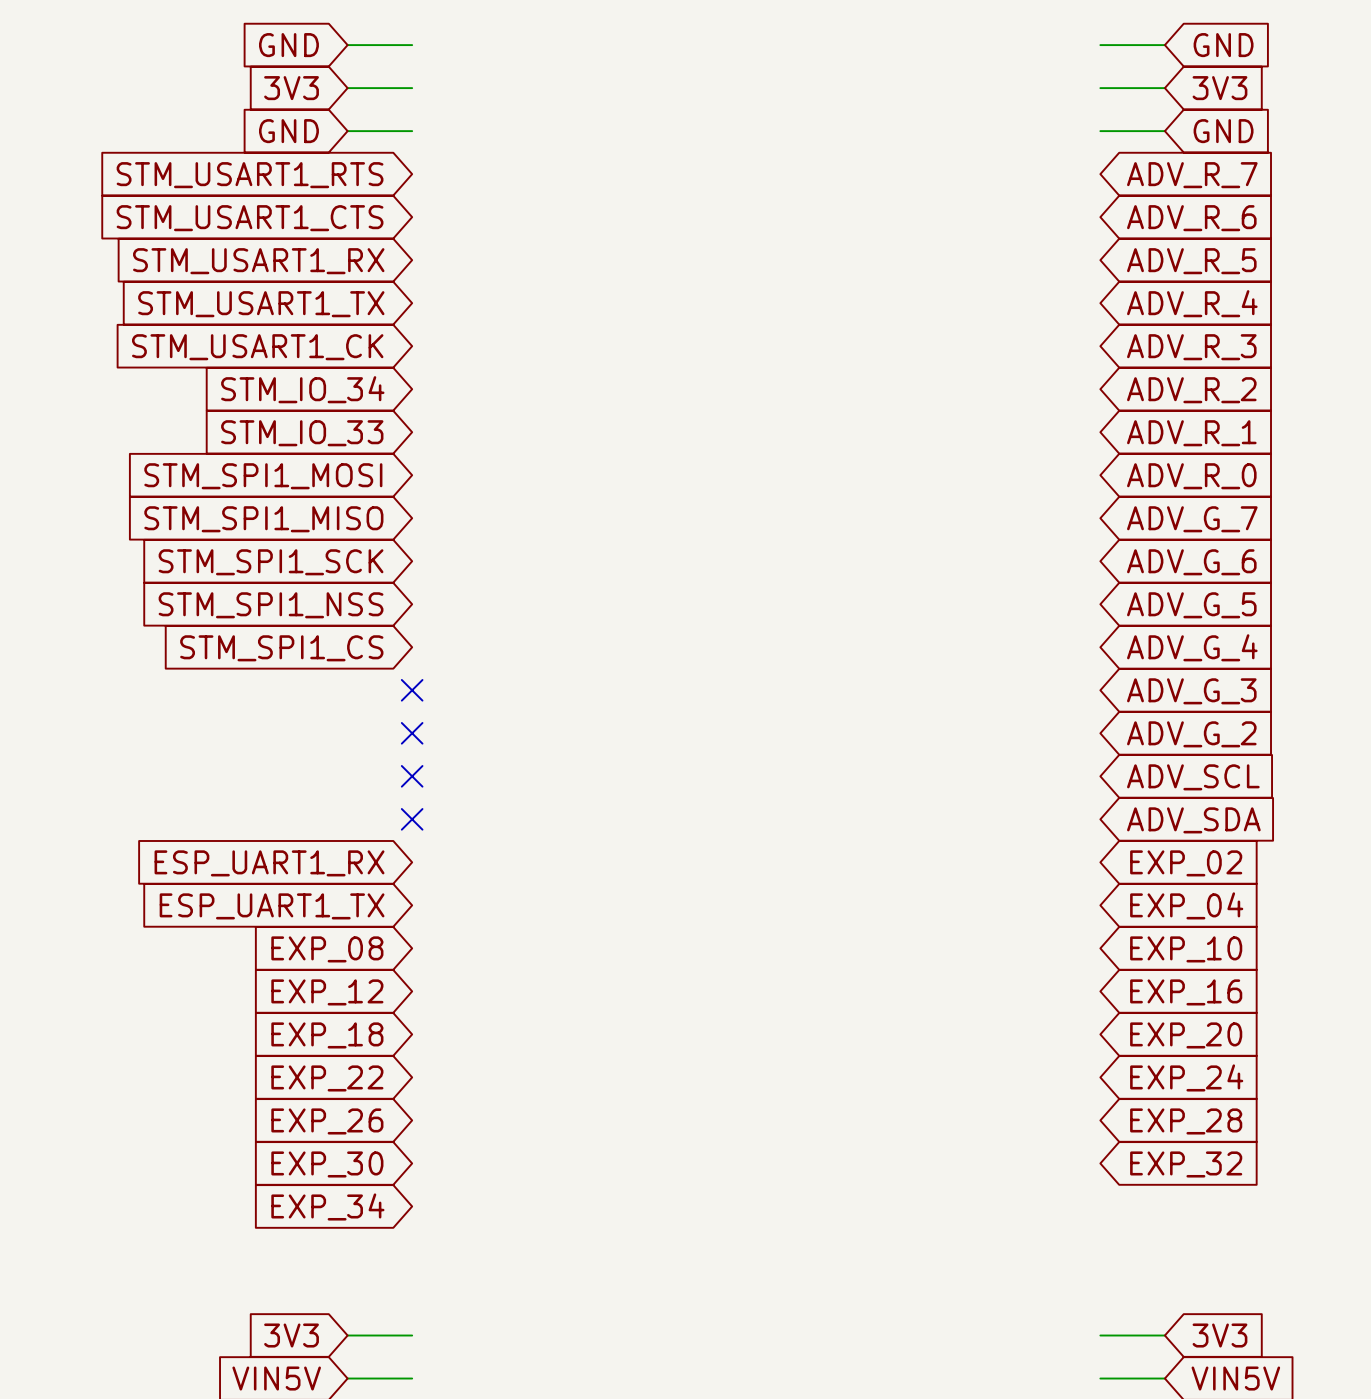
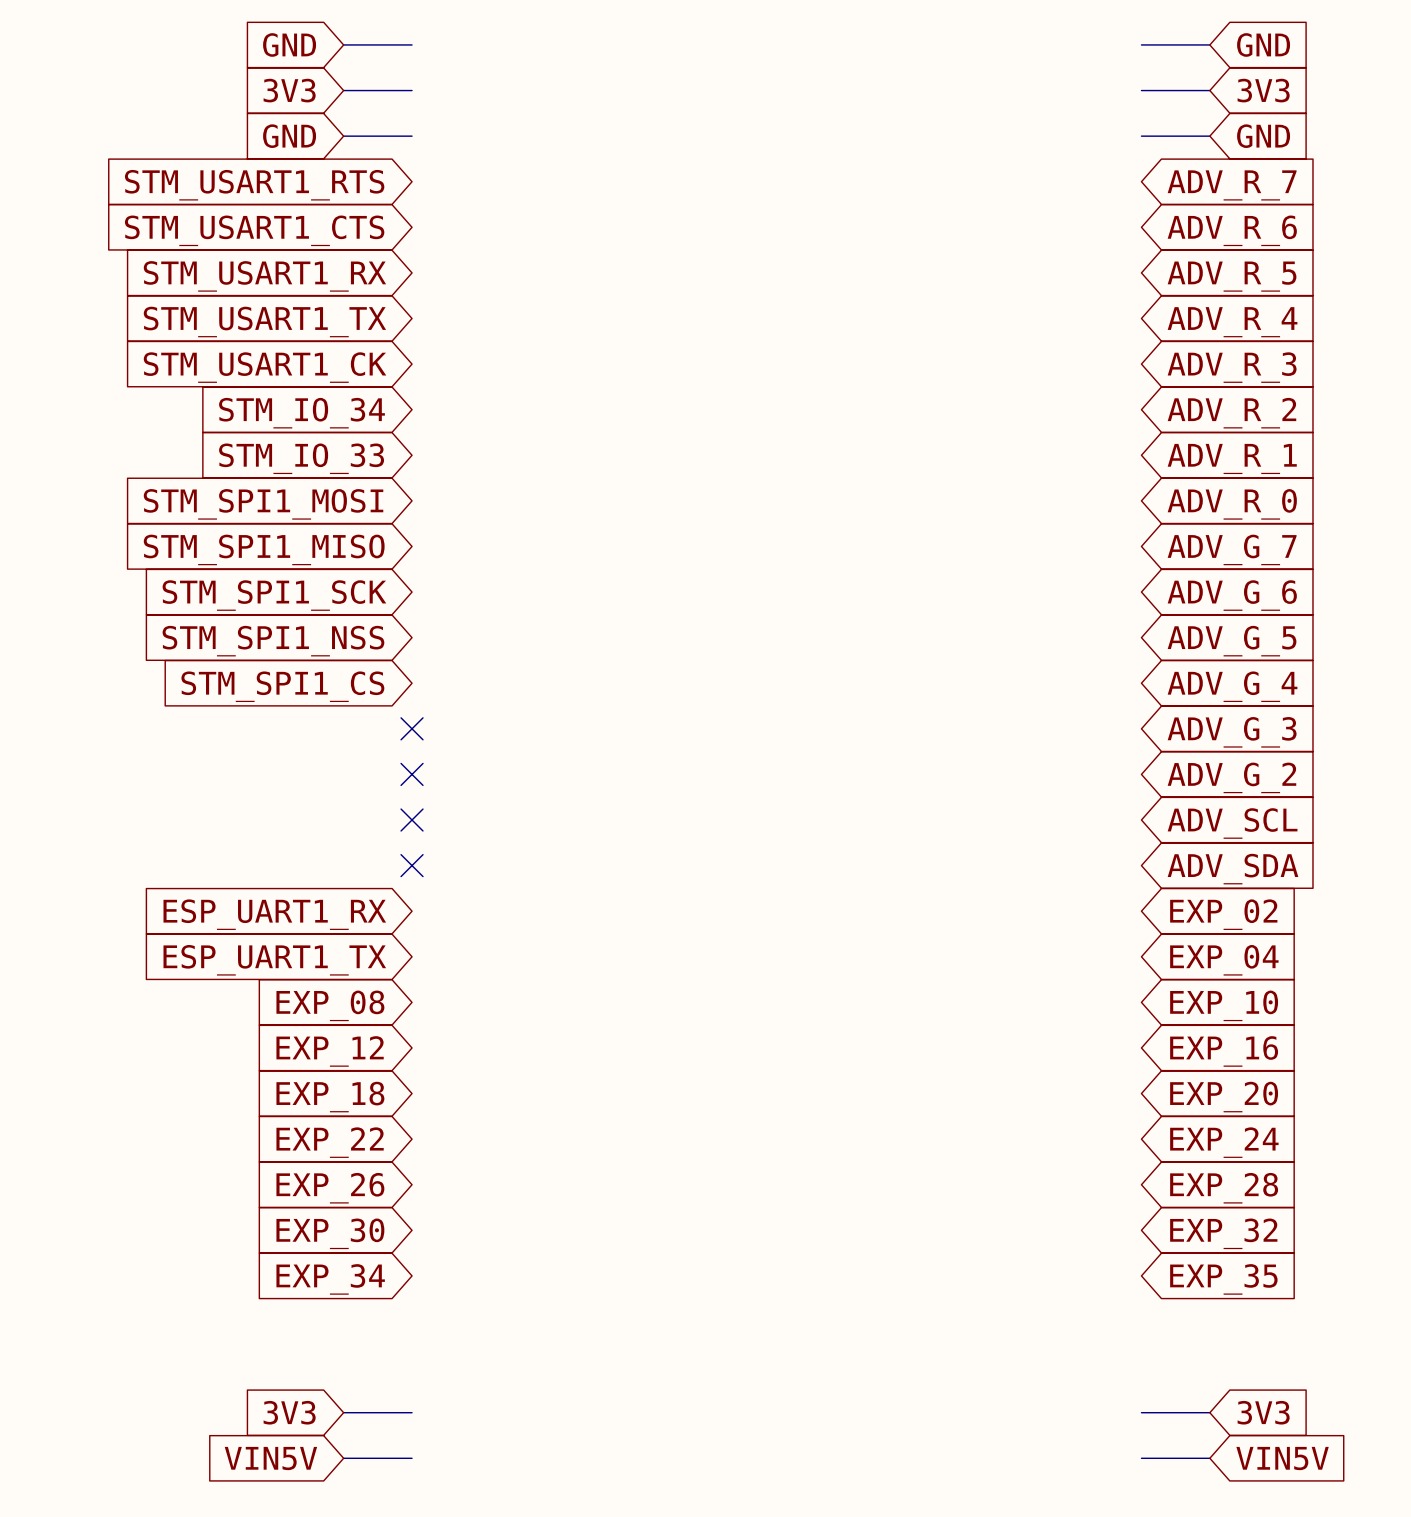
global label: none -> EXP_35 (1223, 1279)

